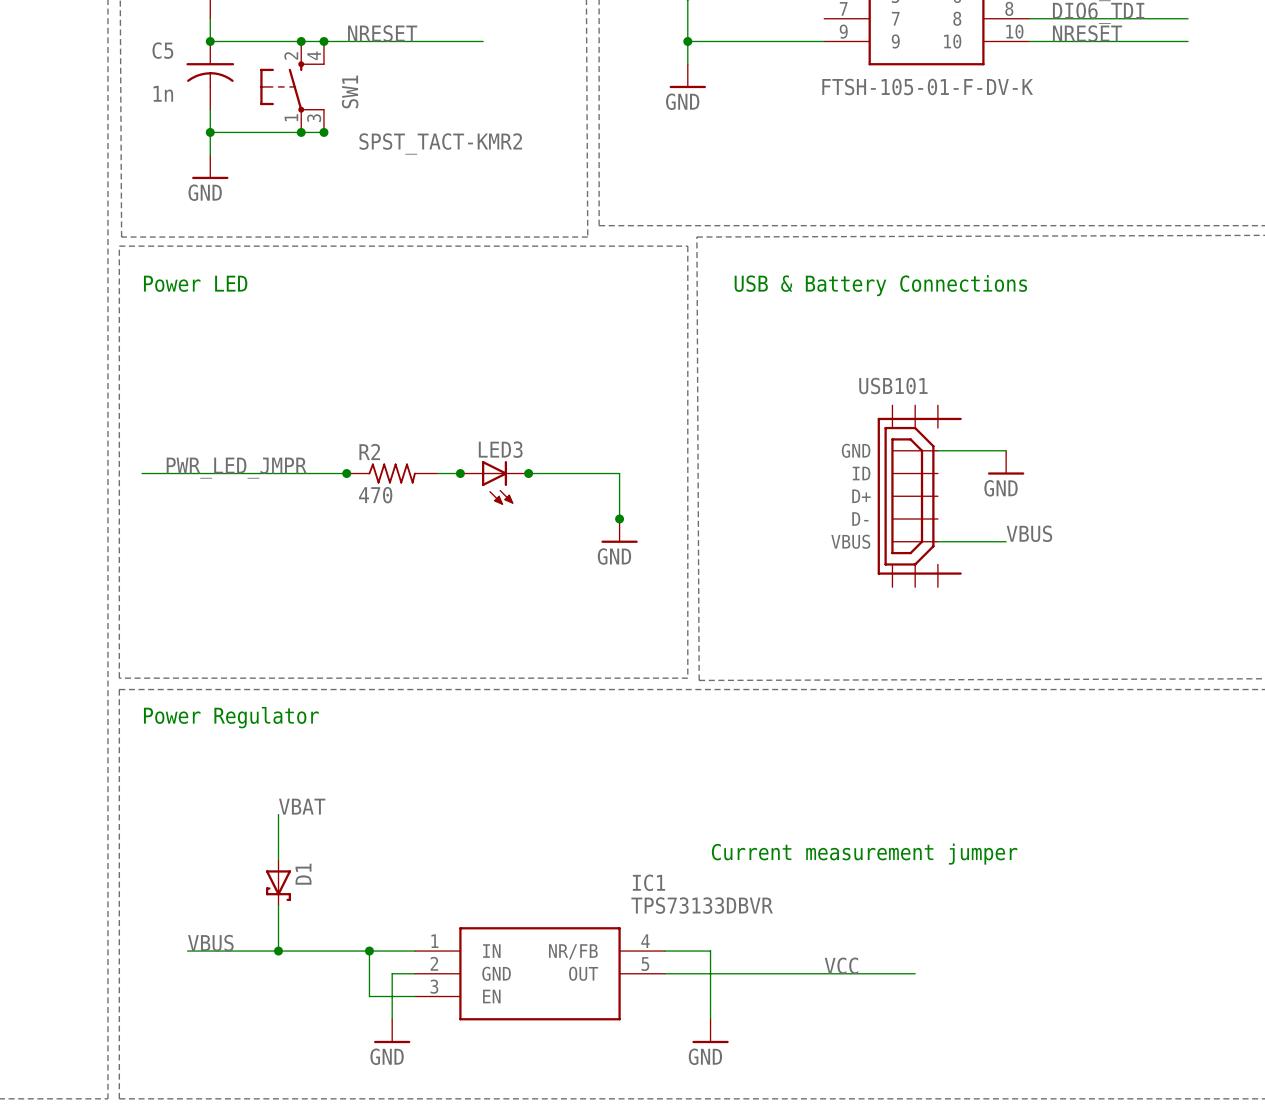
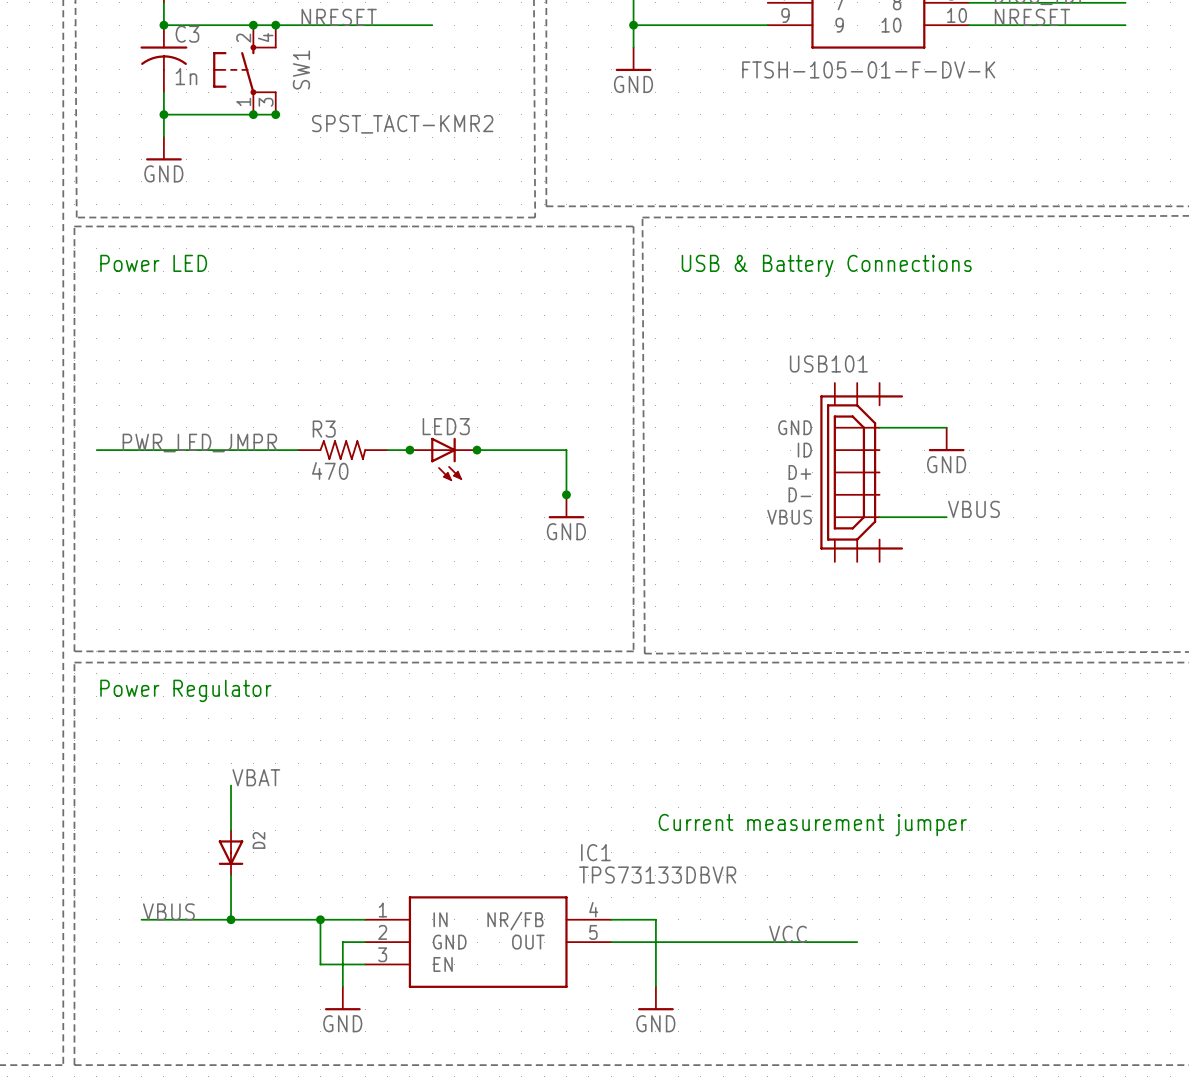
C5 name: C5 (162, 50) -> C3 (187, 34)
C5 value position: 1n (163, 93) -> 1n (186, 76)
R2 name: R2 (369, 452) -> R3 (324, 429)
junction: (346, 473) -> none
D1: (278, 882) -> none
D2: none -> (231, 852)

